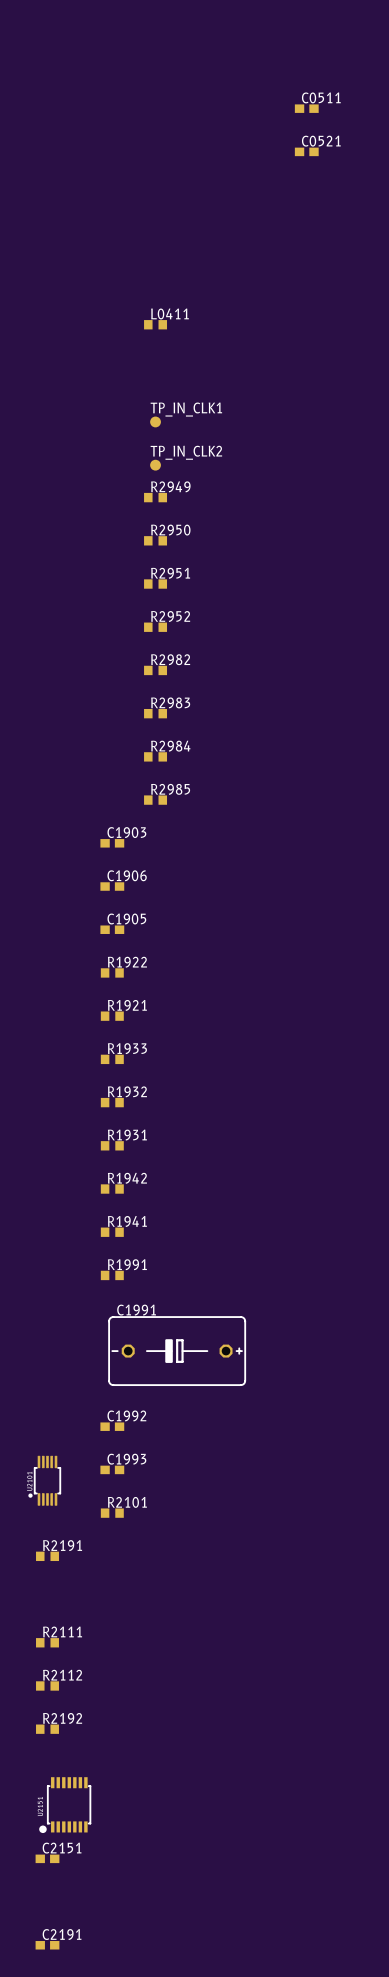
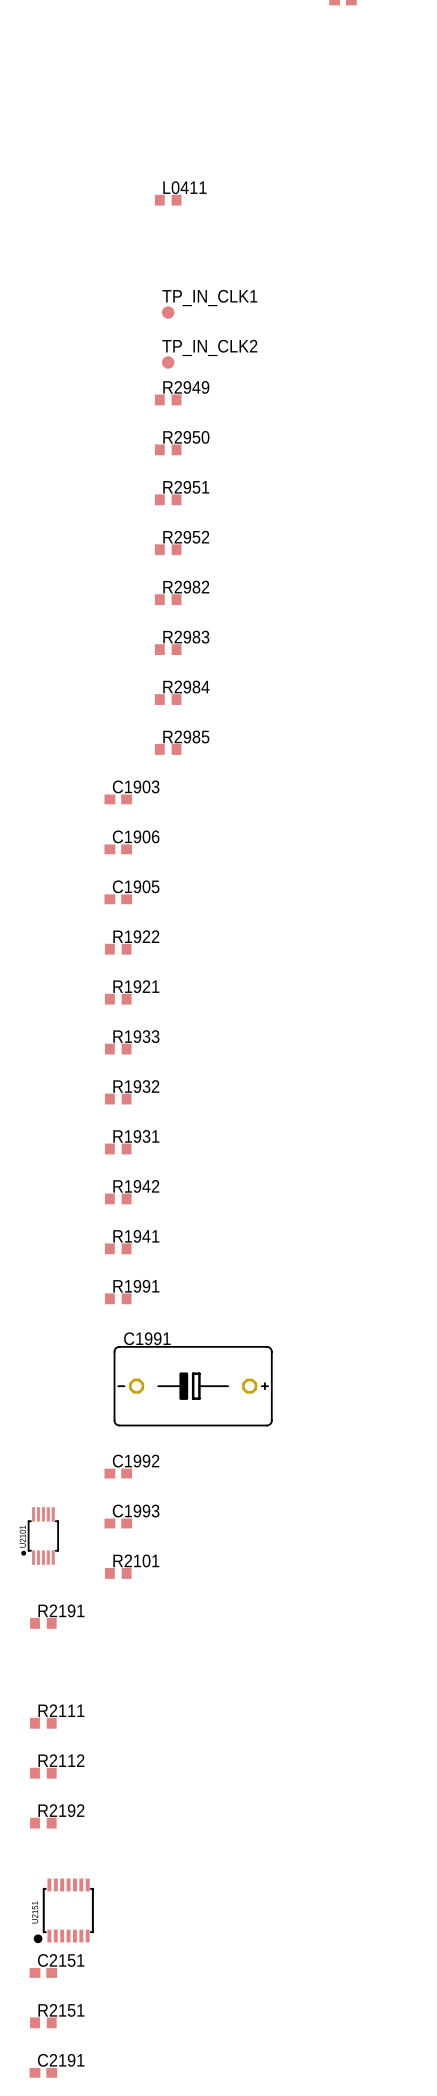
R2151: none -> (43, 2022)

